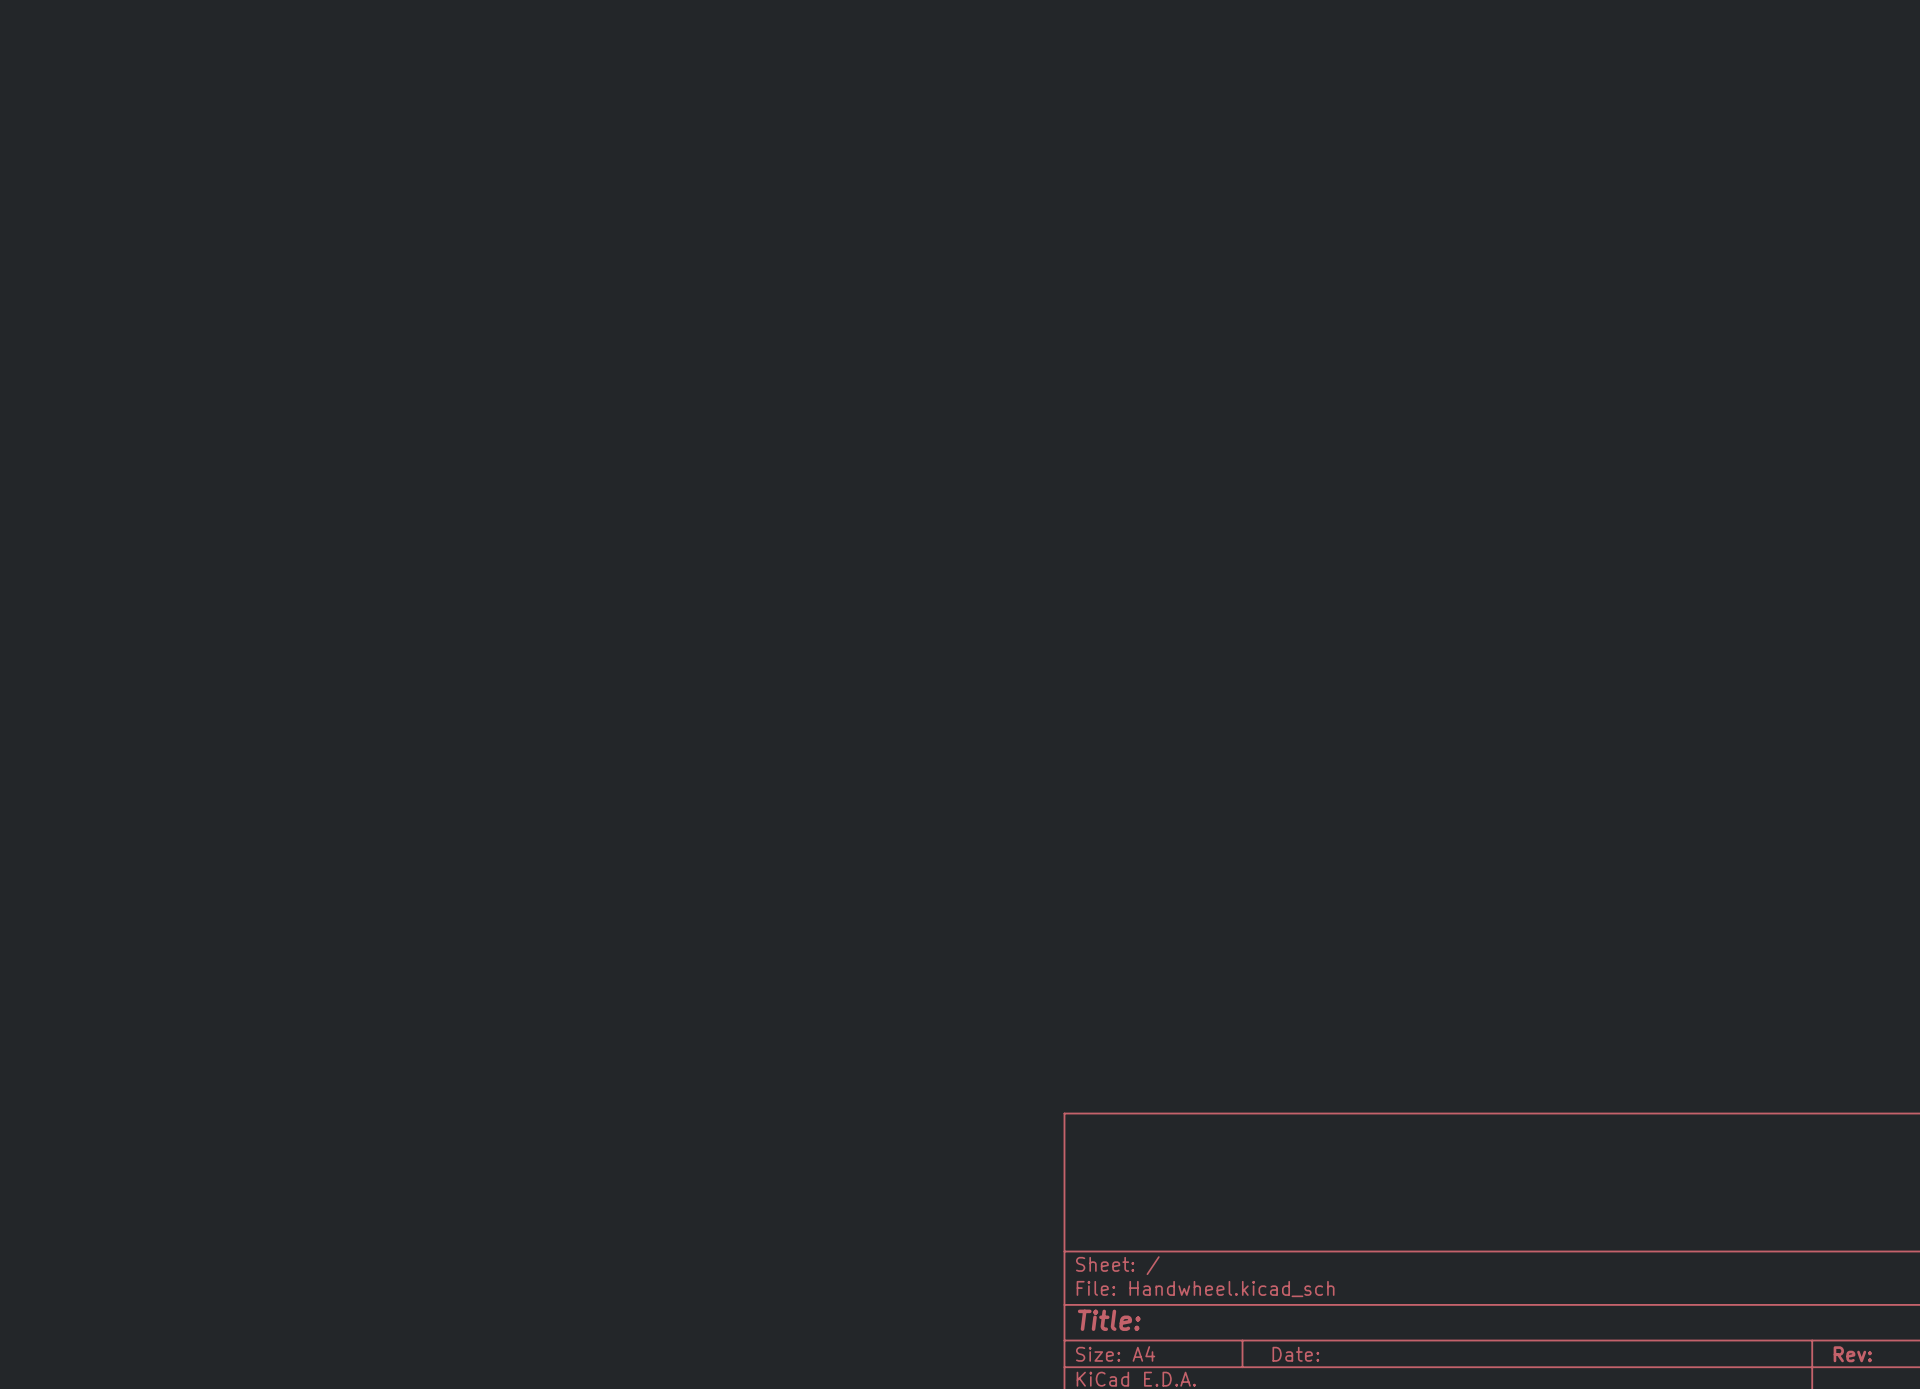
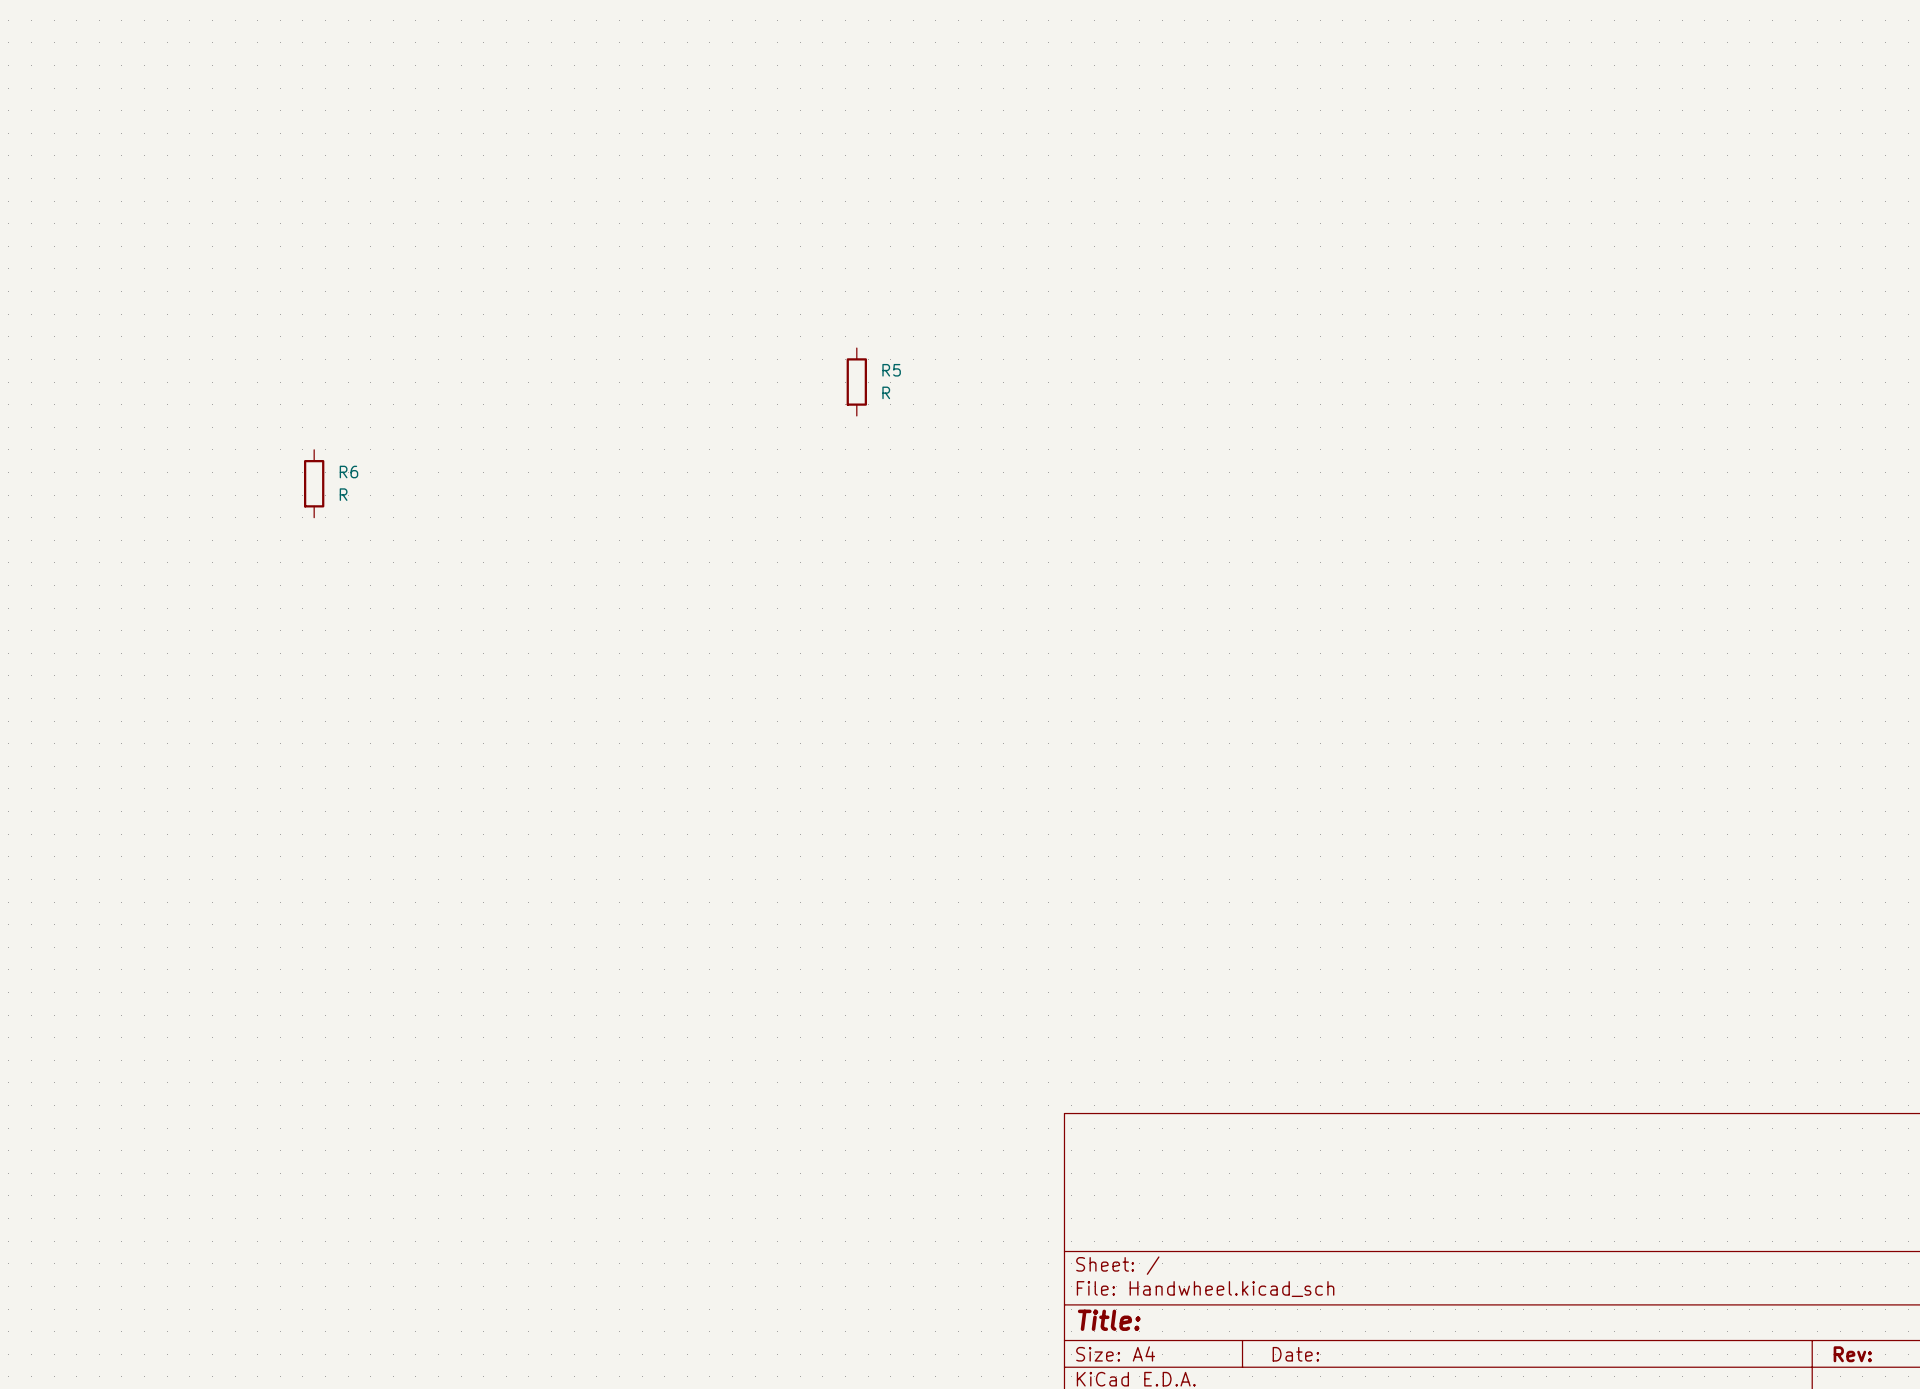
R5: none -> R (856, 382)
R6: none -> R (314, 483)

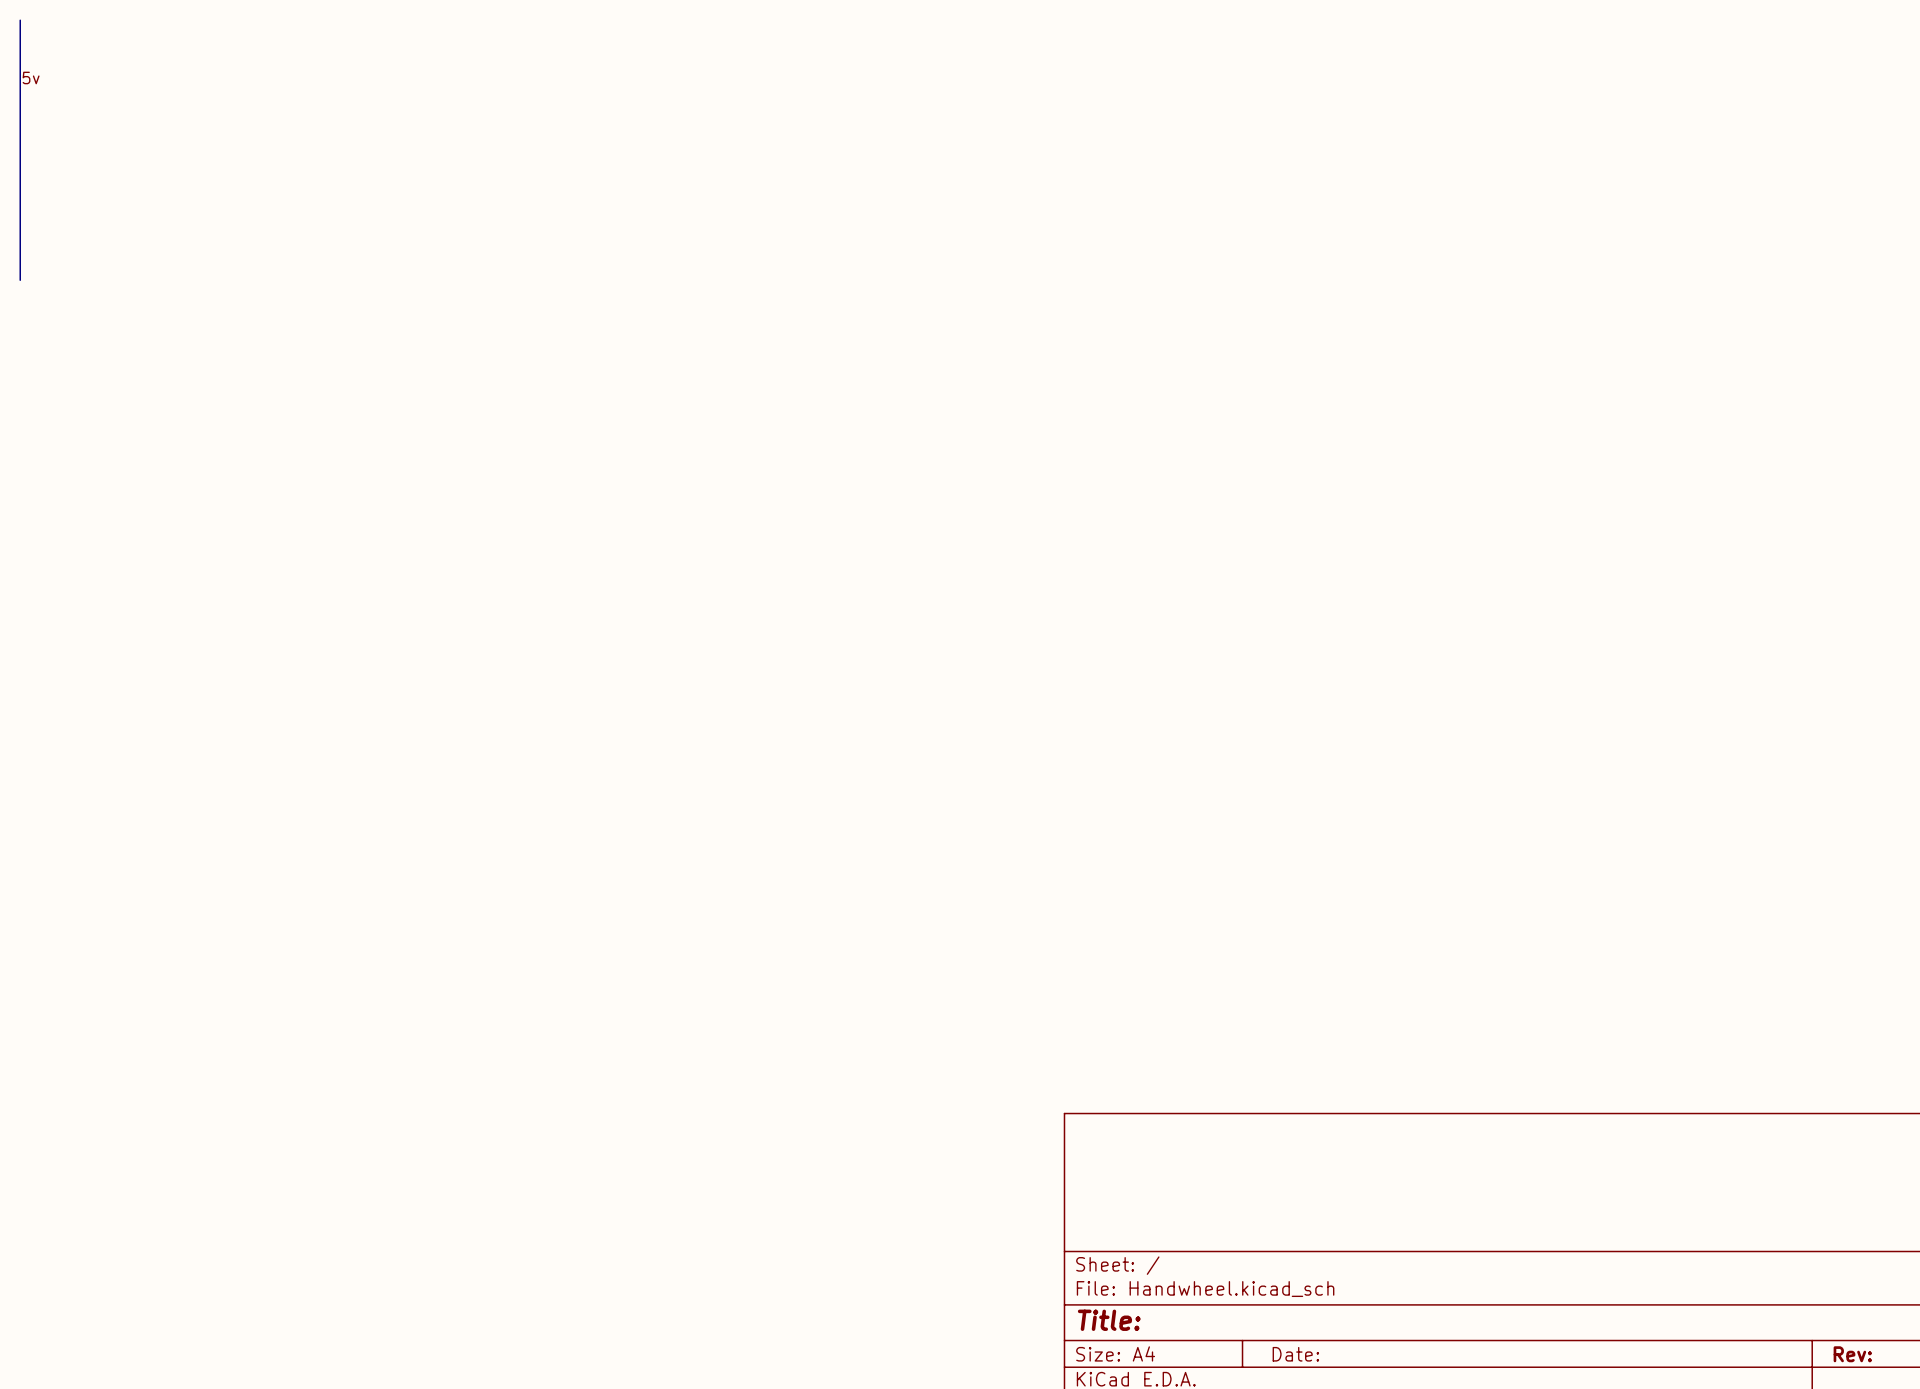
wire: none -> (20, 20) (20, 280)
label: none -> 5v (31, 77)
R5: R (856, 382) -> none
R6: R (314, 483) -> none

